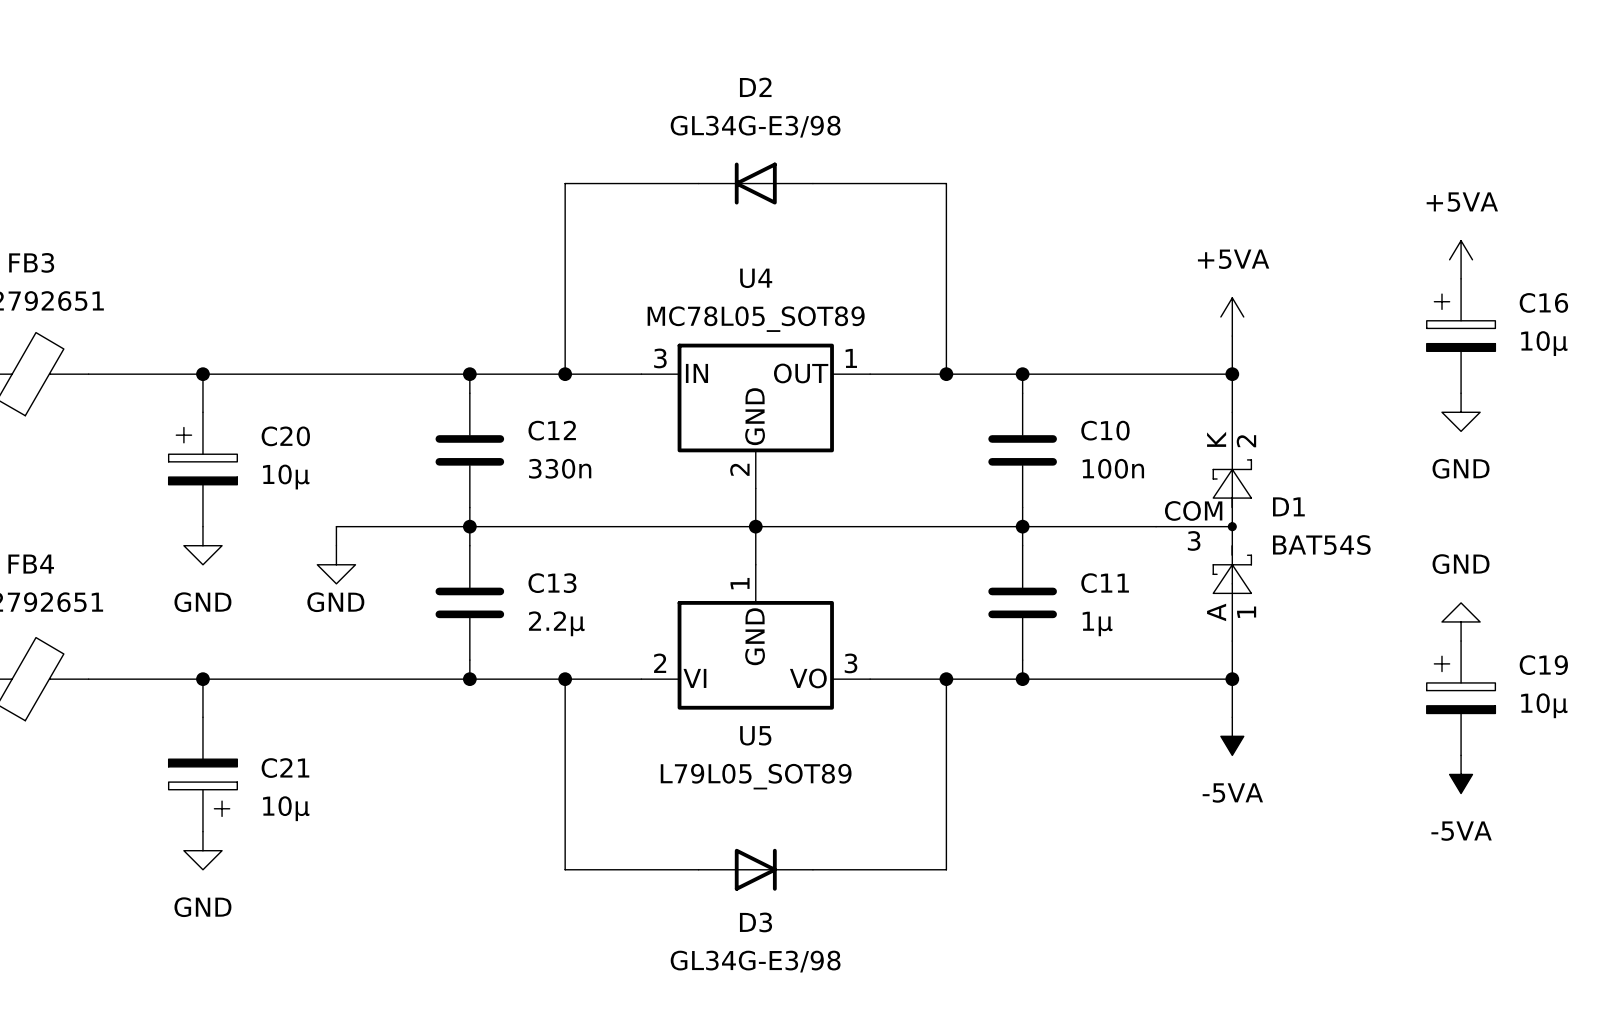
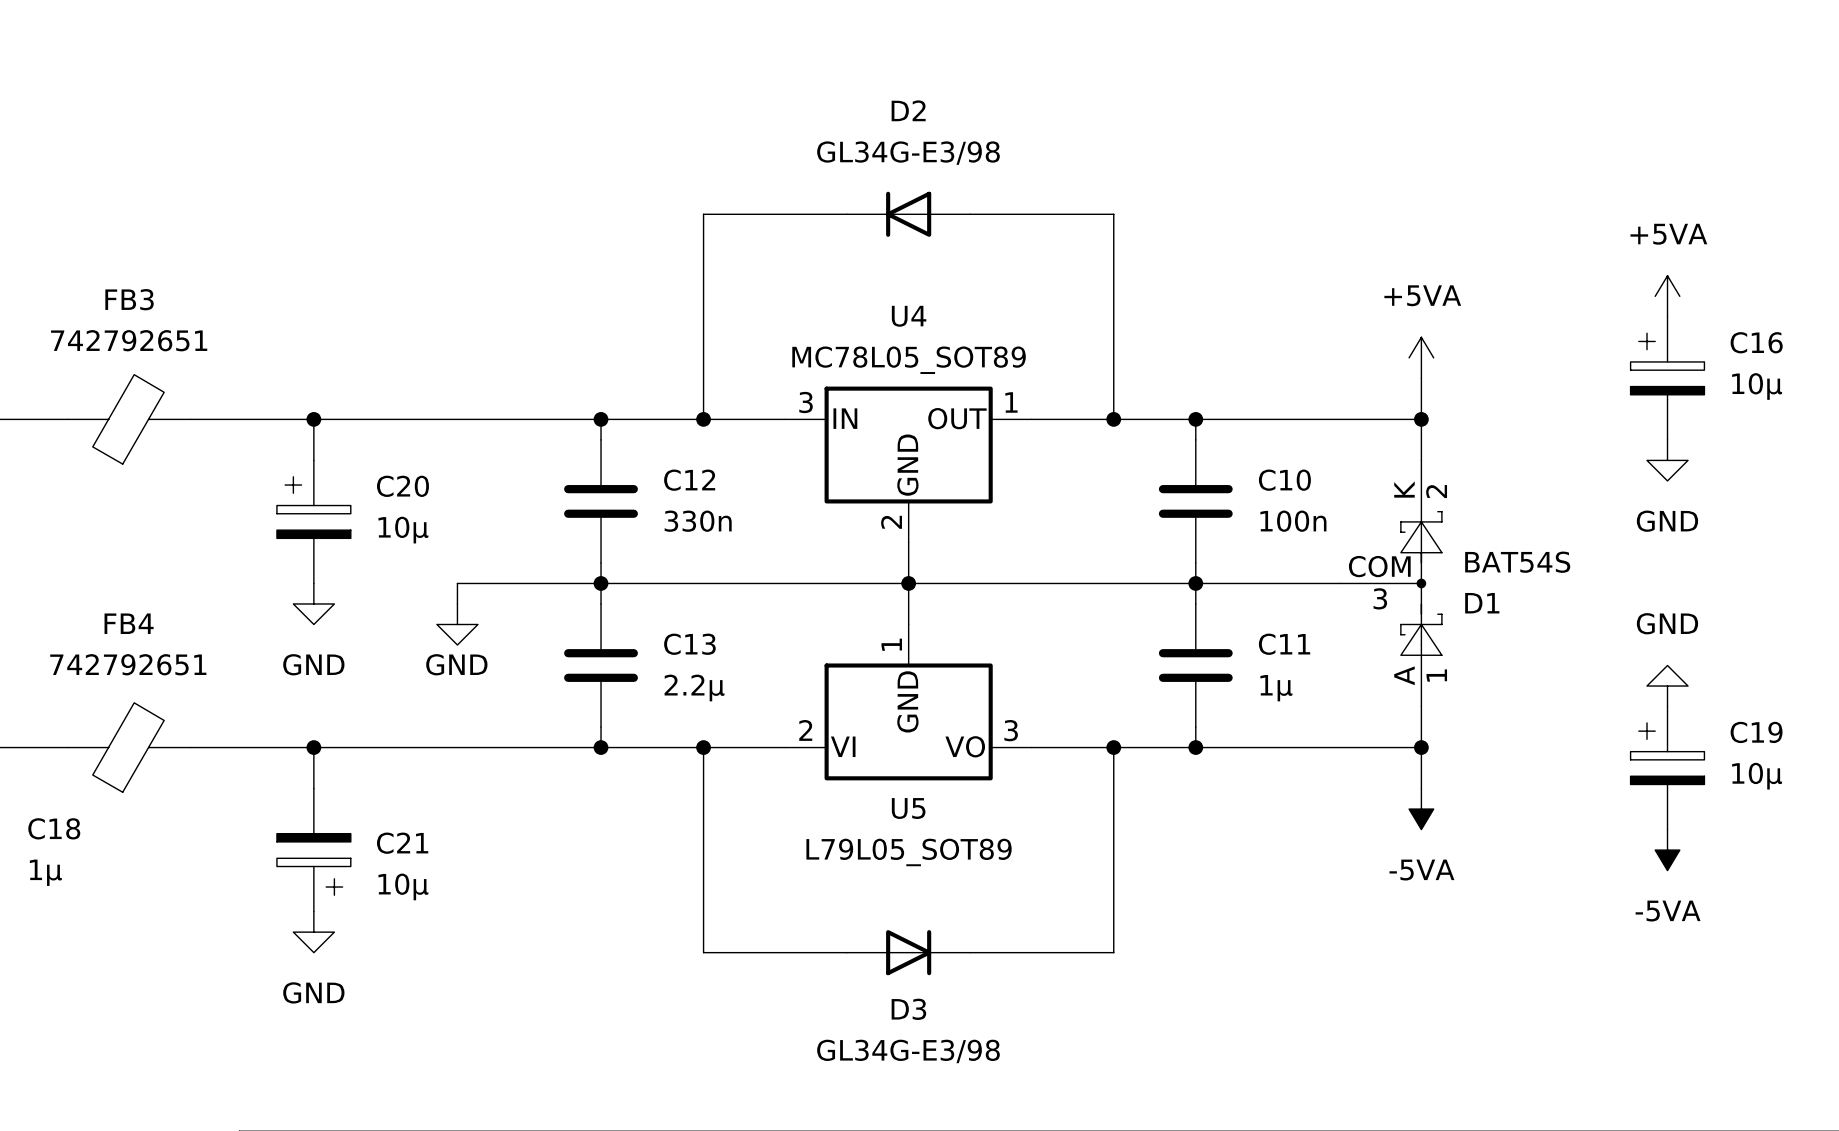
D1 name position: D1 (1288, 506) -> D1 (1482, 603)
D1 value position: BAT54S (1321, 545) -> BAT54S (1517, 562)

